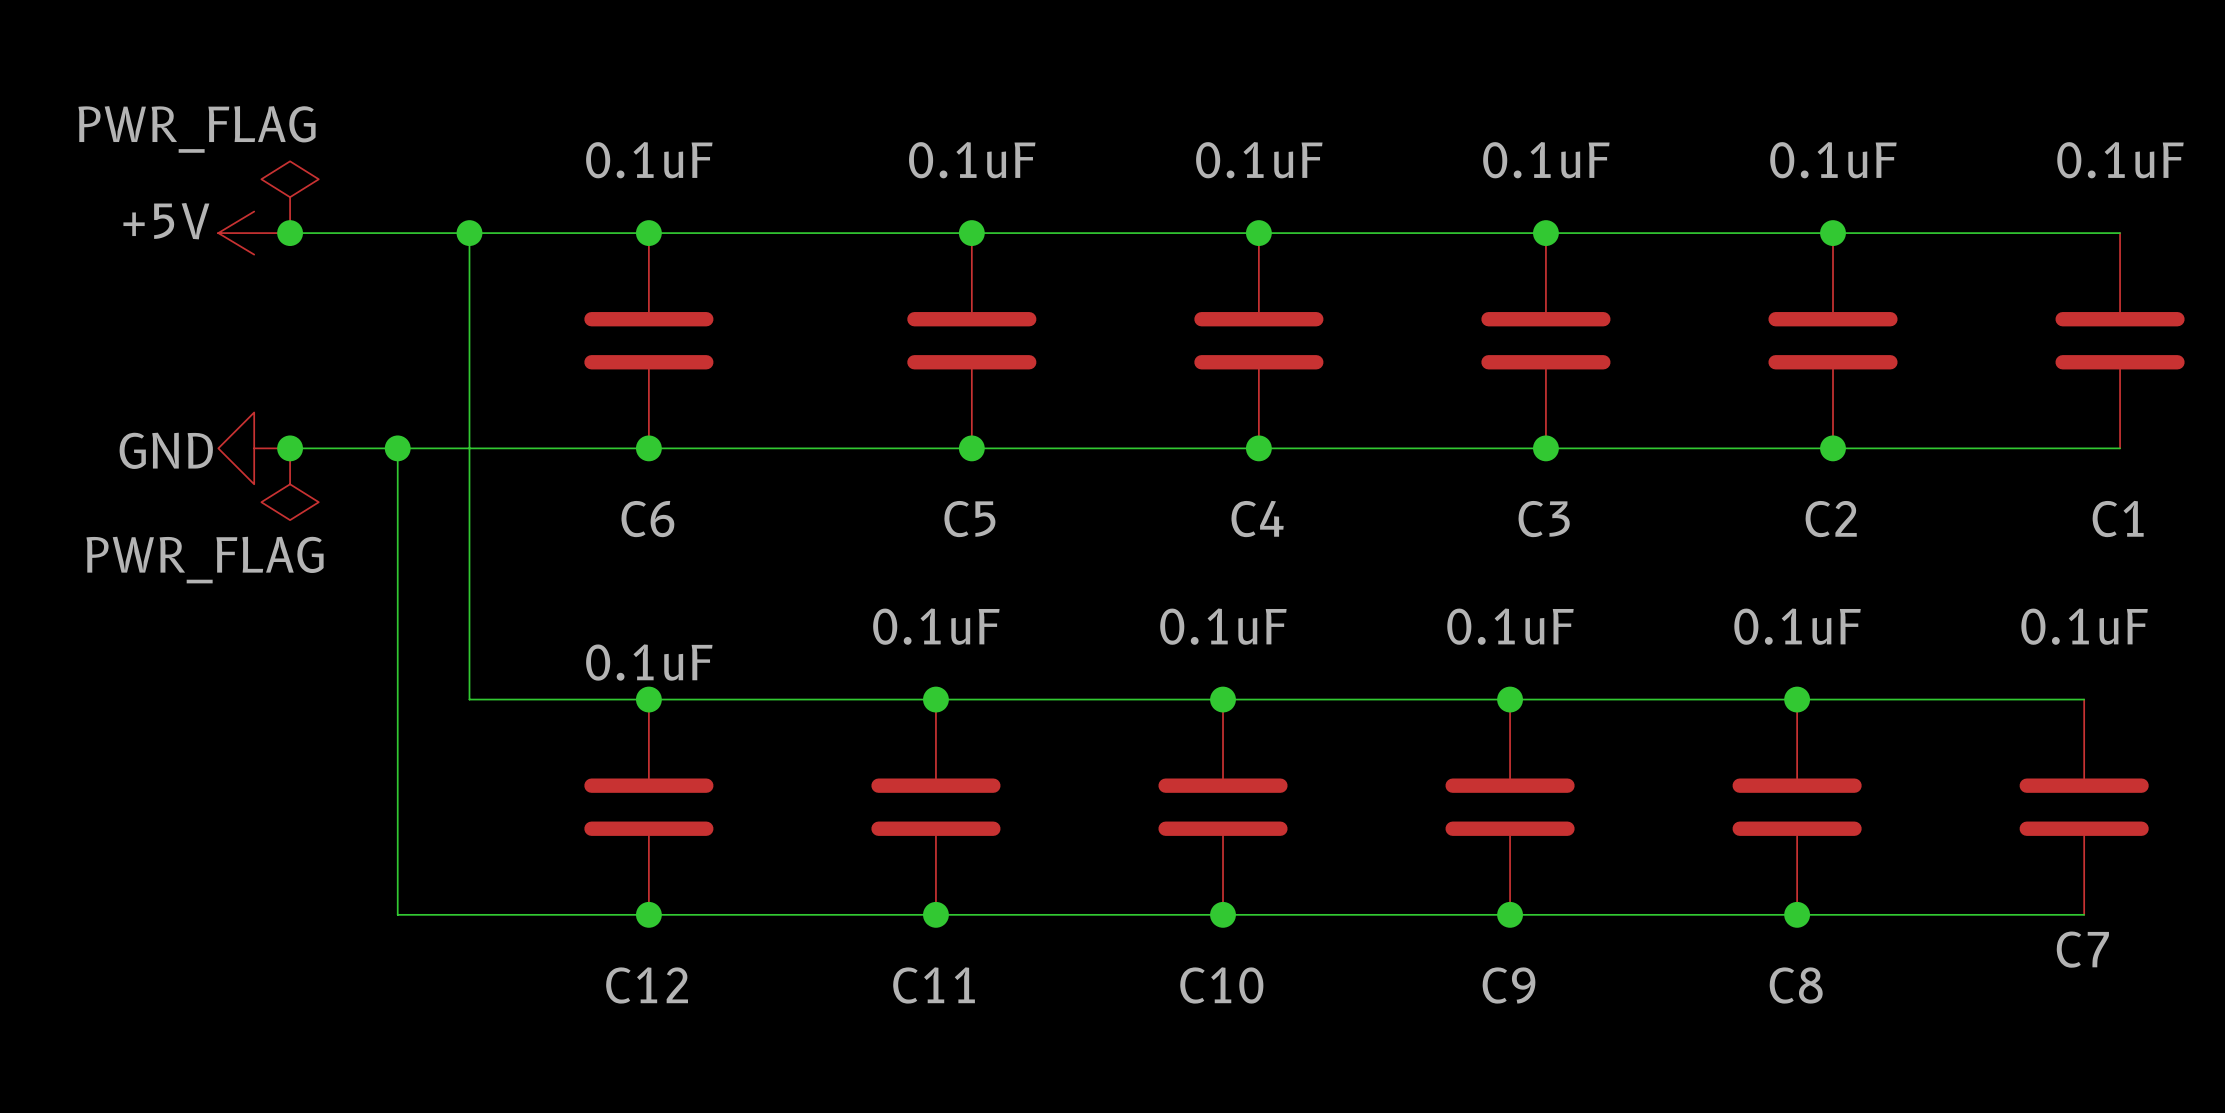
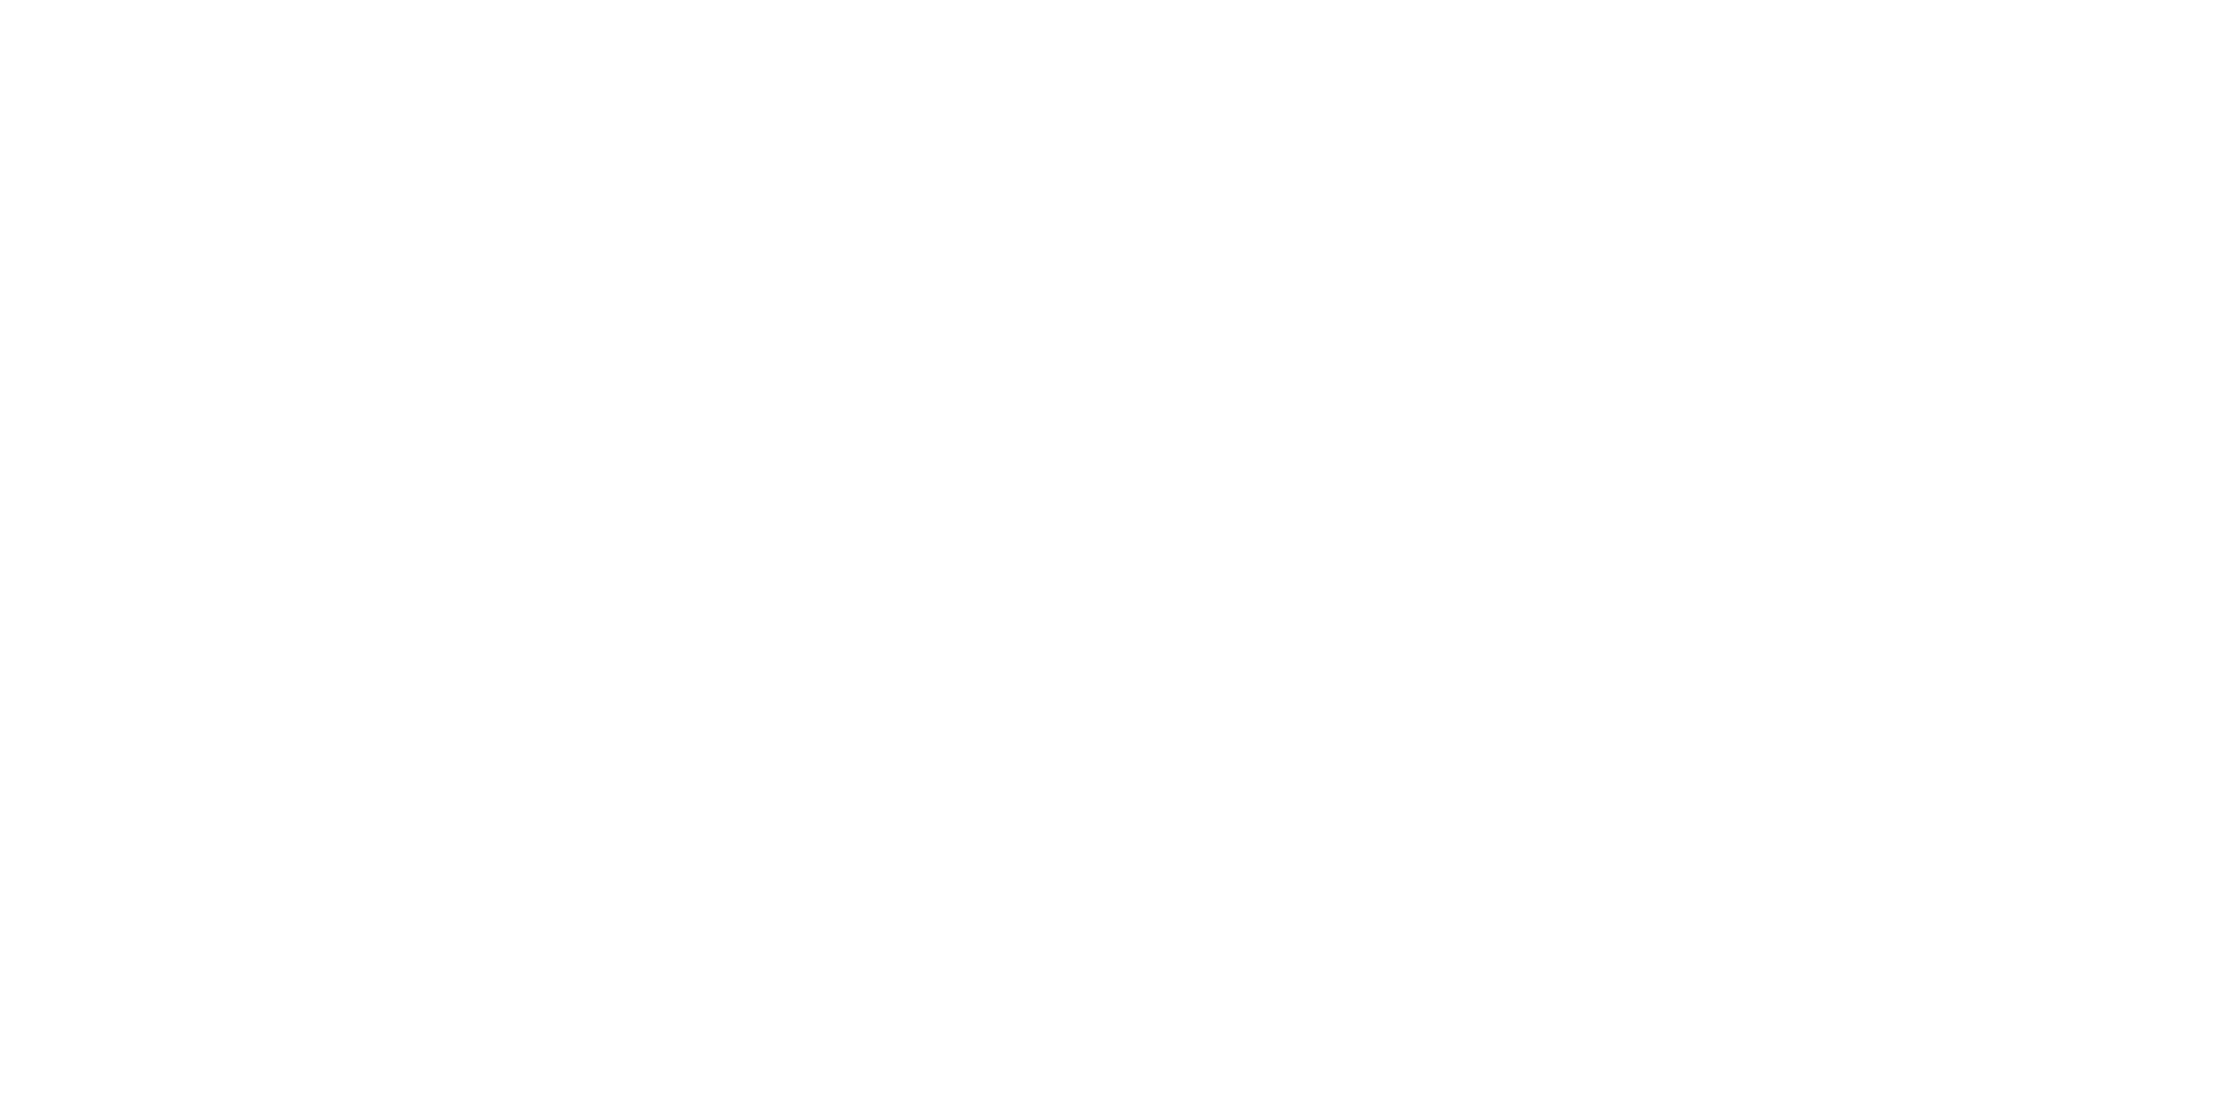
power symbol: PWR_FLAG (290, 197) -> none
power symbol: +5V (254, 233) -> none
wire: (290, 233) (2120, 233) -> none
junction: (290, 233) -> none
wire: (469, 233) (469, 699) (2084, 699) -> none
junction: (469, 233) -> none
junction: (648, 233) -> none
junction: (971, 233) -> none
junction: (1258, 233) -> none
junction: (1545, 233) -> none
junction: (1833, 233) -> none
C6: 0.1uF (648, 340) -> none
C5: 0.1uF (971, 340) -> none
C4: 0.1uF (1258, 340) -> none
C3: 0.1uF (1545, 340) -> none
C2: 0.1uF (1833, 340) -> none
C1: 0.1uF (2120, 340) -> none
power symbol: GND (254, 448) -> none
wire: (290, 448) (2120, 448) -> none
junction: (290, 448) -> none
wire: (397, 448) (397, 914) (2084, 914) -> none
junction: (397, 448) -> none
junction: (648, 448) -> none
junction: (971, 448) -> none
junction: (1258, 448) -> none
junction: (1545, 448) -> none
junction: (1833, 448) -> none
power symbol: PWR_FLAG (290, 484) -> none
junction: (648, 699) -> none
junction: (935, 699) -> none
junction: (1223, 699) -> none
junction: (1510, 699) -> none
junction: (1797, 699) -> none
C12: 0.1uF (648, 807) -> none
C11: 0.1uF (935, 807) -> none
C10: 0.1uF (1223, 807) -> none
C9: 0.1uF (1510, 807) -> none
C8: 0.1uF (1797, 807) -> none
C7: 0.1uF (2084, 807) -> none
junction: (648, 914) -> none
junction: (935, 914) -> none
junction: (1223, 914) -> none
junction: (1510, 914) -> none
junction: (1797, 914) -> none

